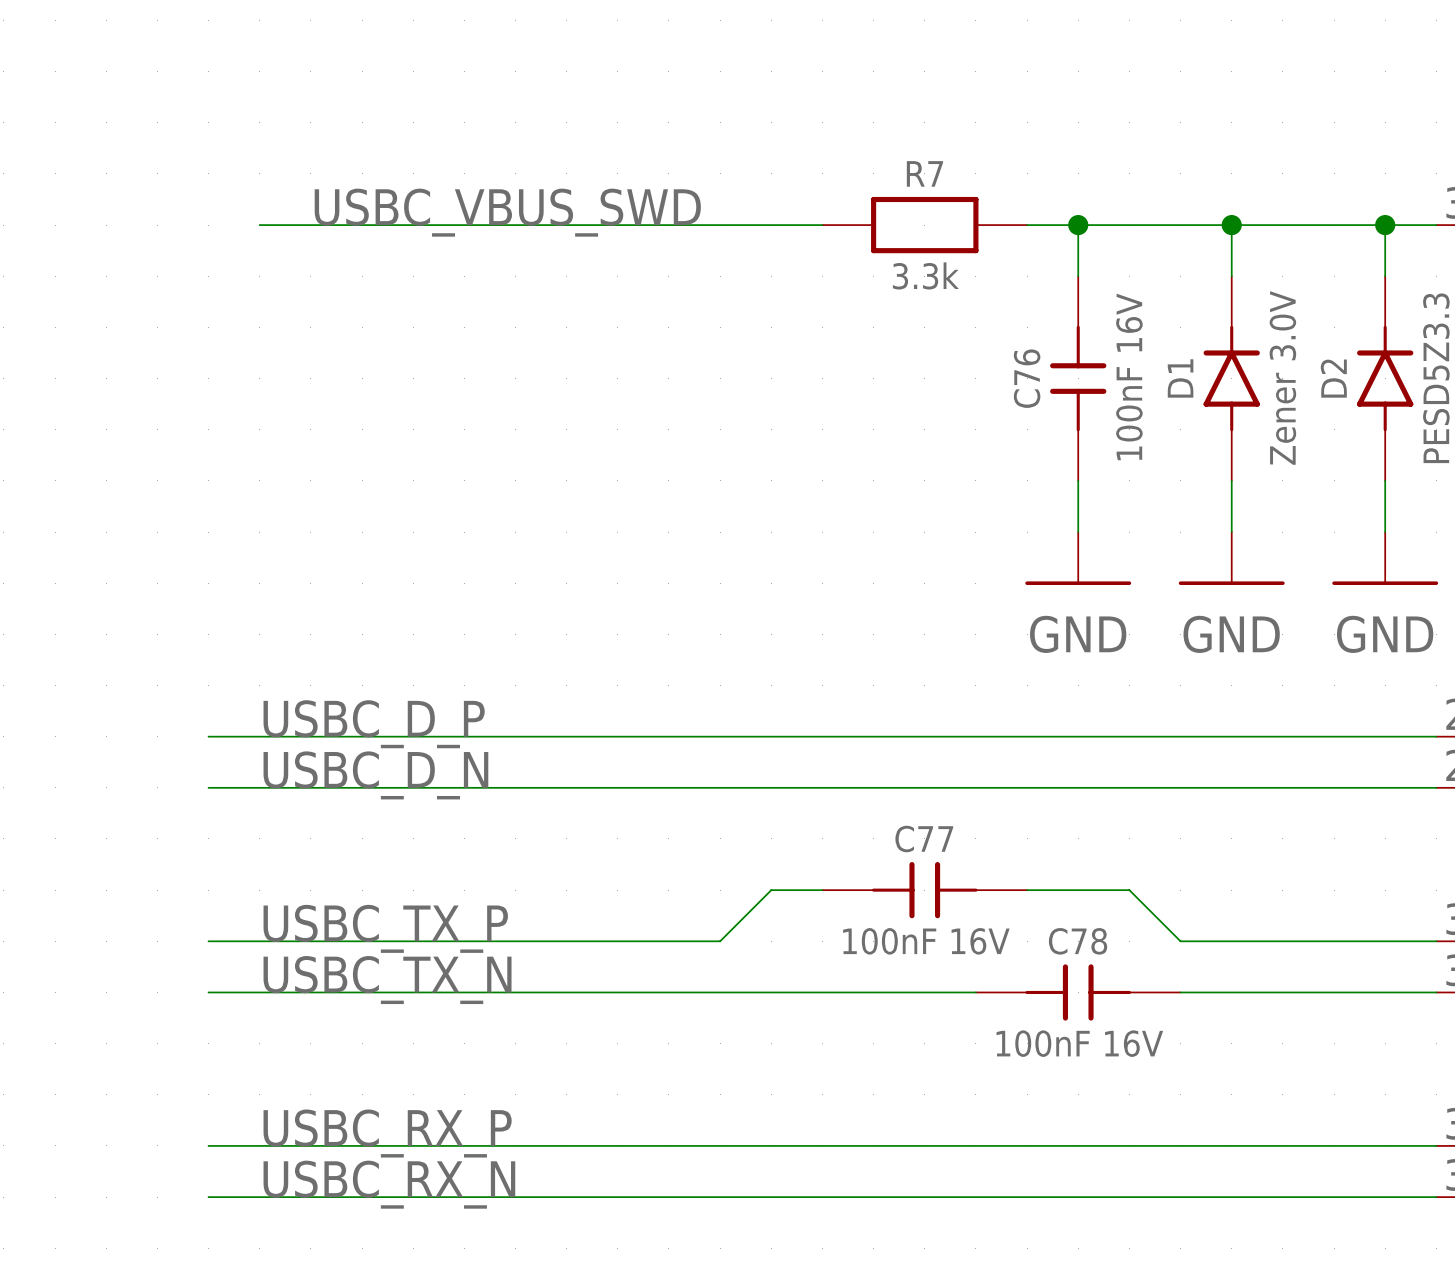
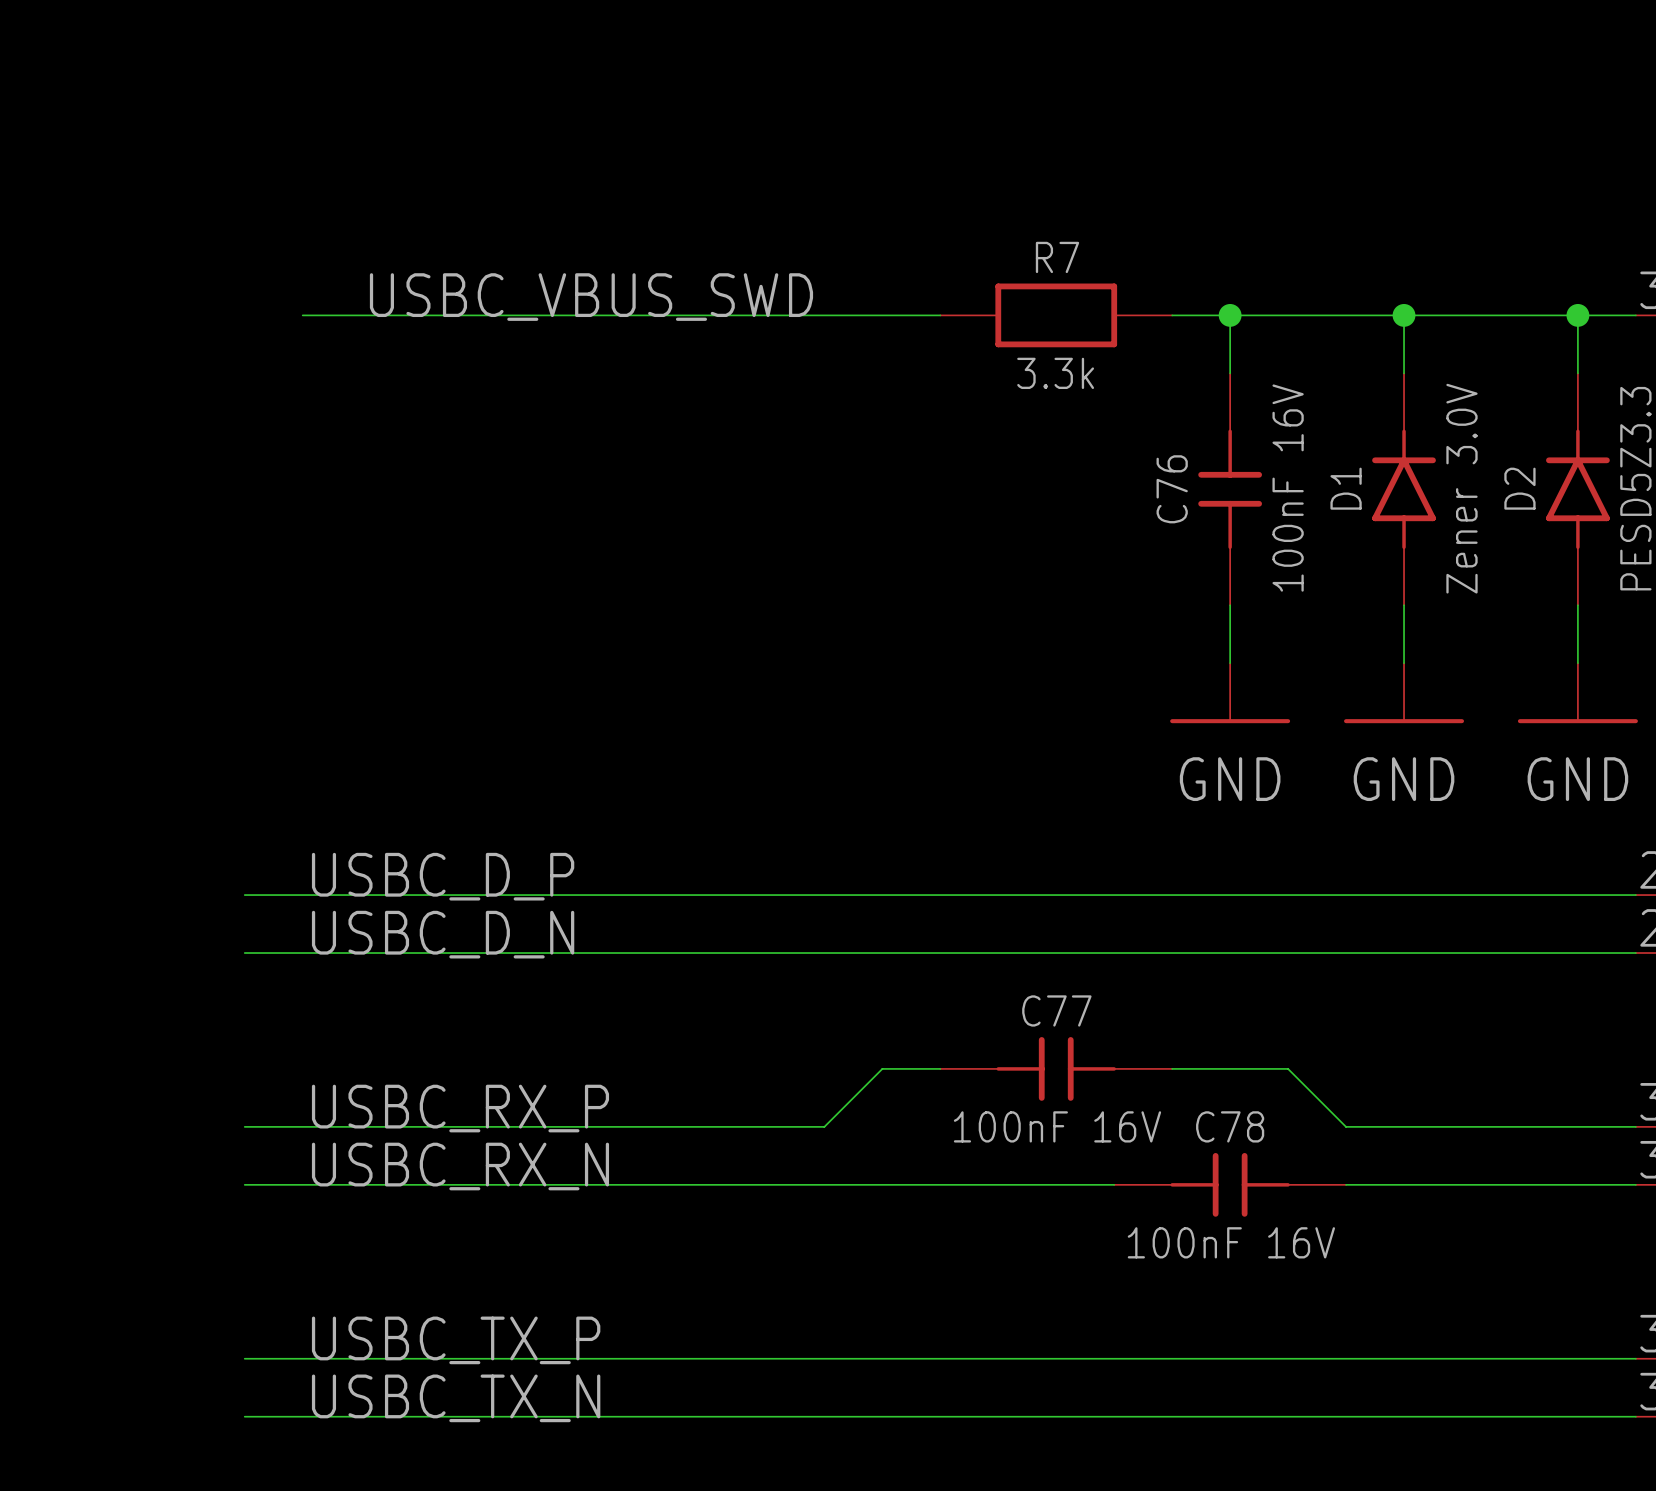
label: USBC_TX_P (385, 928) -> USBC_RX_P (460, 1108)
label: USBC_TX_N (387, 980) -> USBC_RX_N (460, 1166)
label: USBC_RX_P (387, 1133) -> USBC_TX_P (456, 1340)
label: USBC_RX_N (389, 1184) -> USBC_TX_N (456, 1398)

